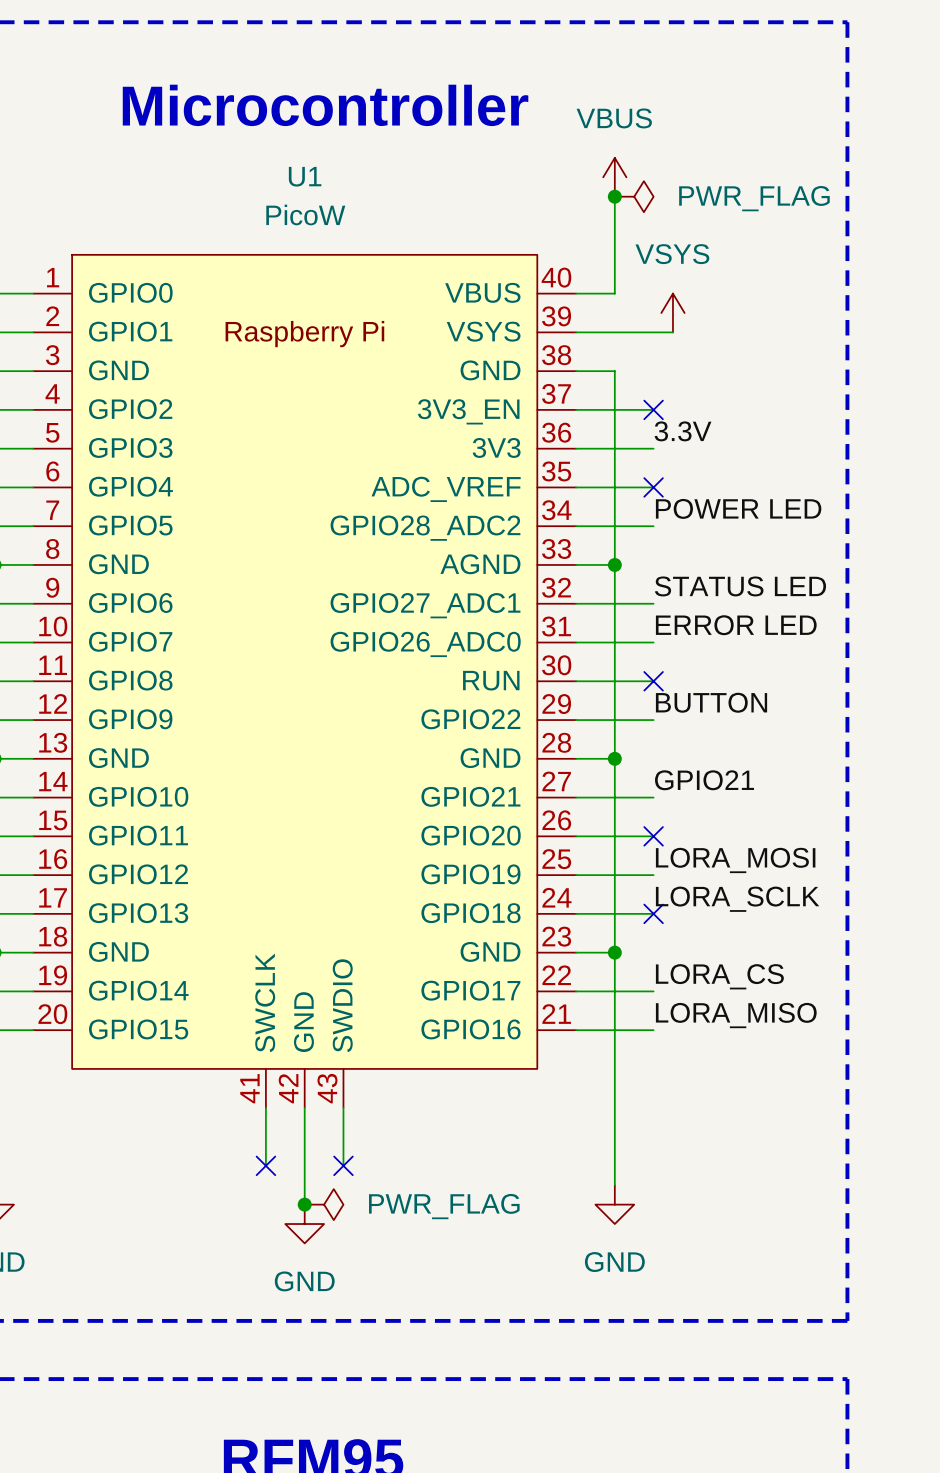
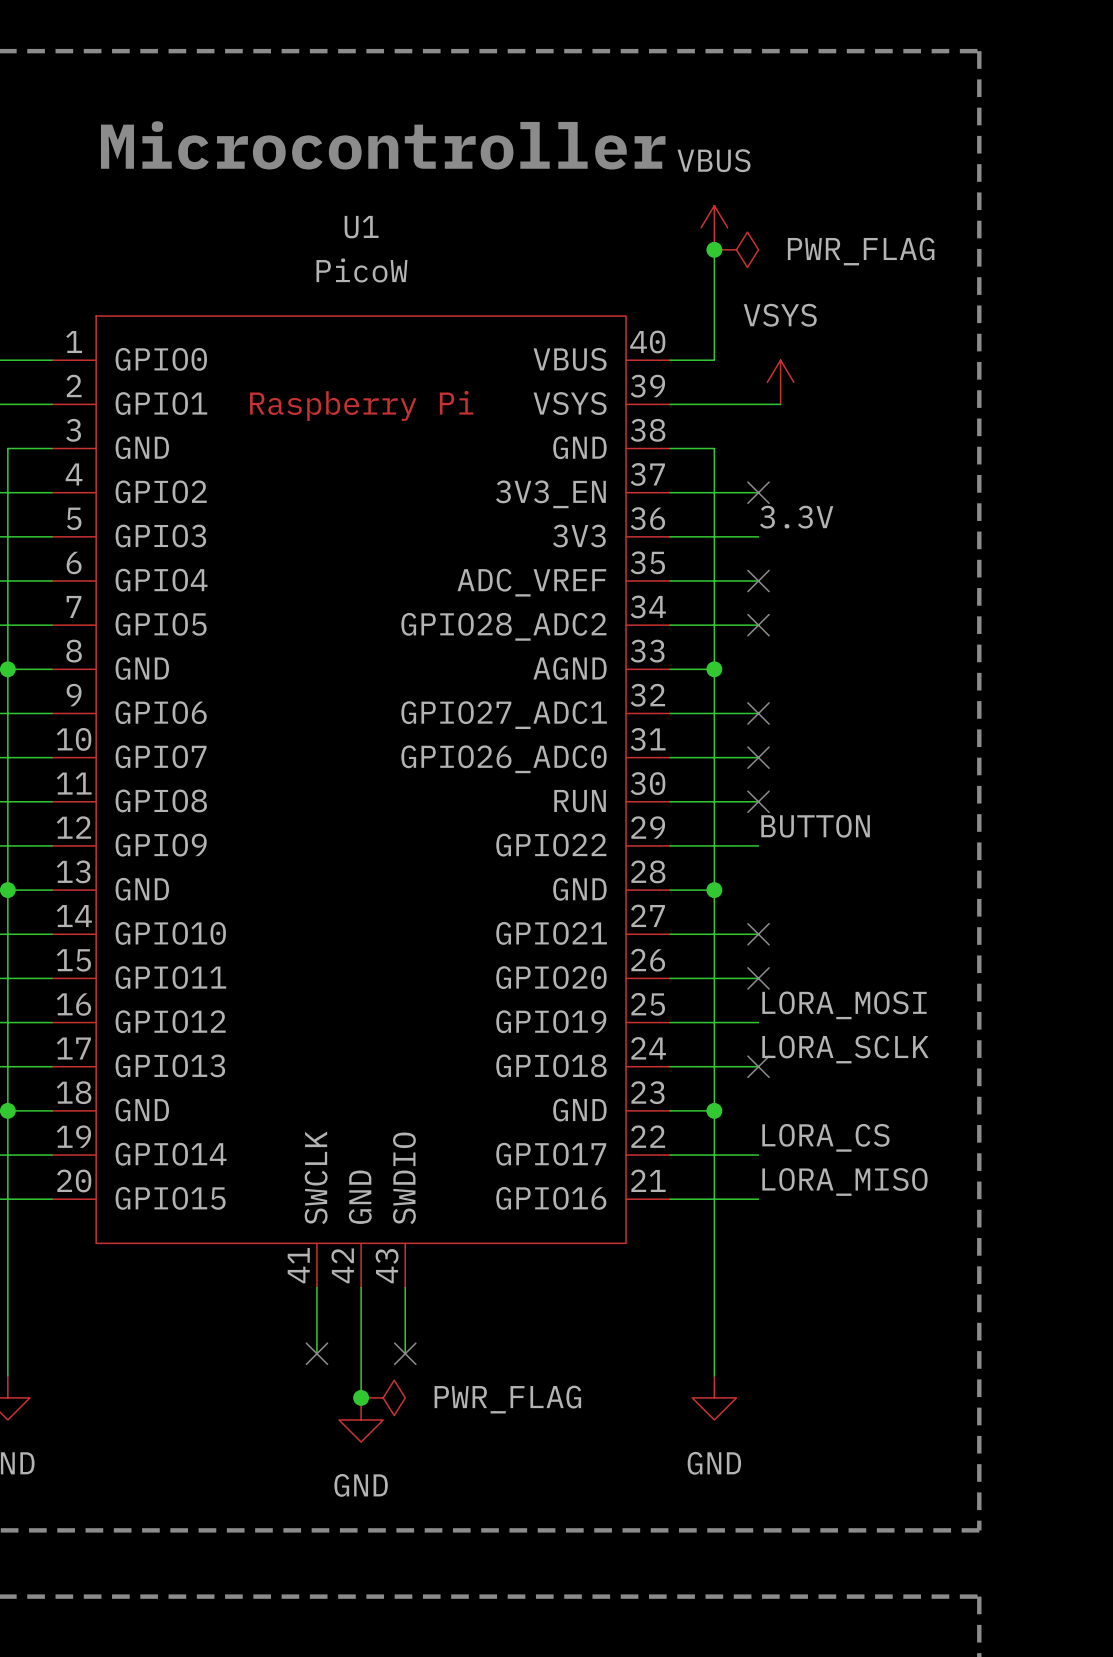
label: POWER LED (738, 508) -> none
no-connect mark: none -> (758, 625)
label: STATUS LED (740, 586) -> none
no-connect mark: none -> (758, 713)
label: ERROR LED (736, 625) -> none
no-connect mark: none -> (758, 757)
label: GPIO21 (704, 780) -> none
no-connect mark: none -> (758, 934)

